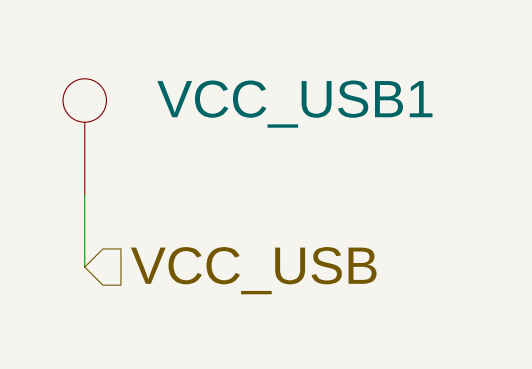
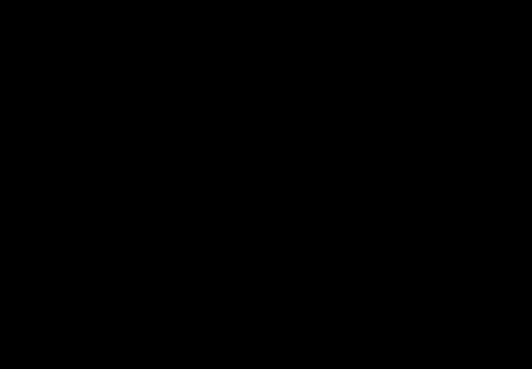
VCC_USB1: (84, 136) -> none
wire: (84, 194) (84, 267) -> none
hierarchical label: VCC_USB (253, 270) -> none

